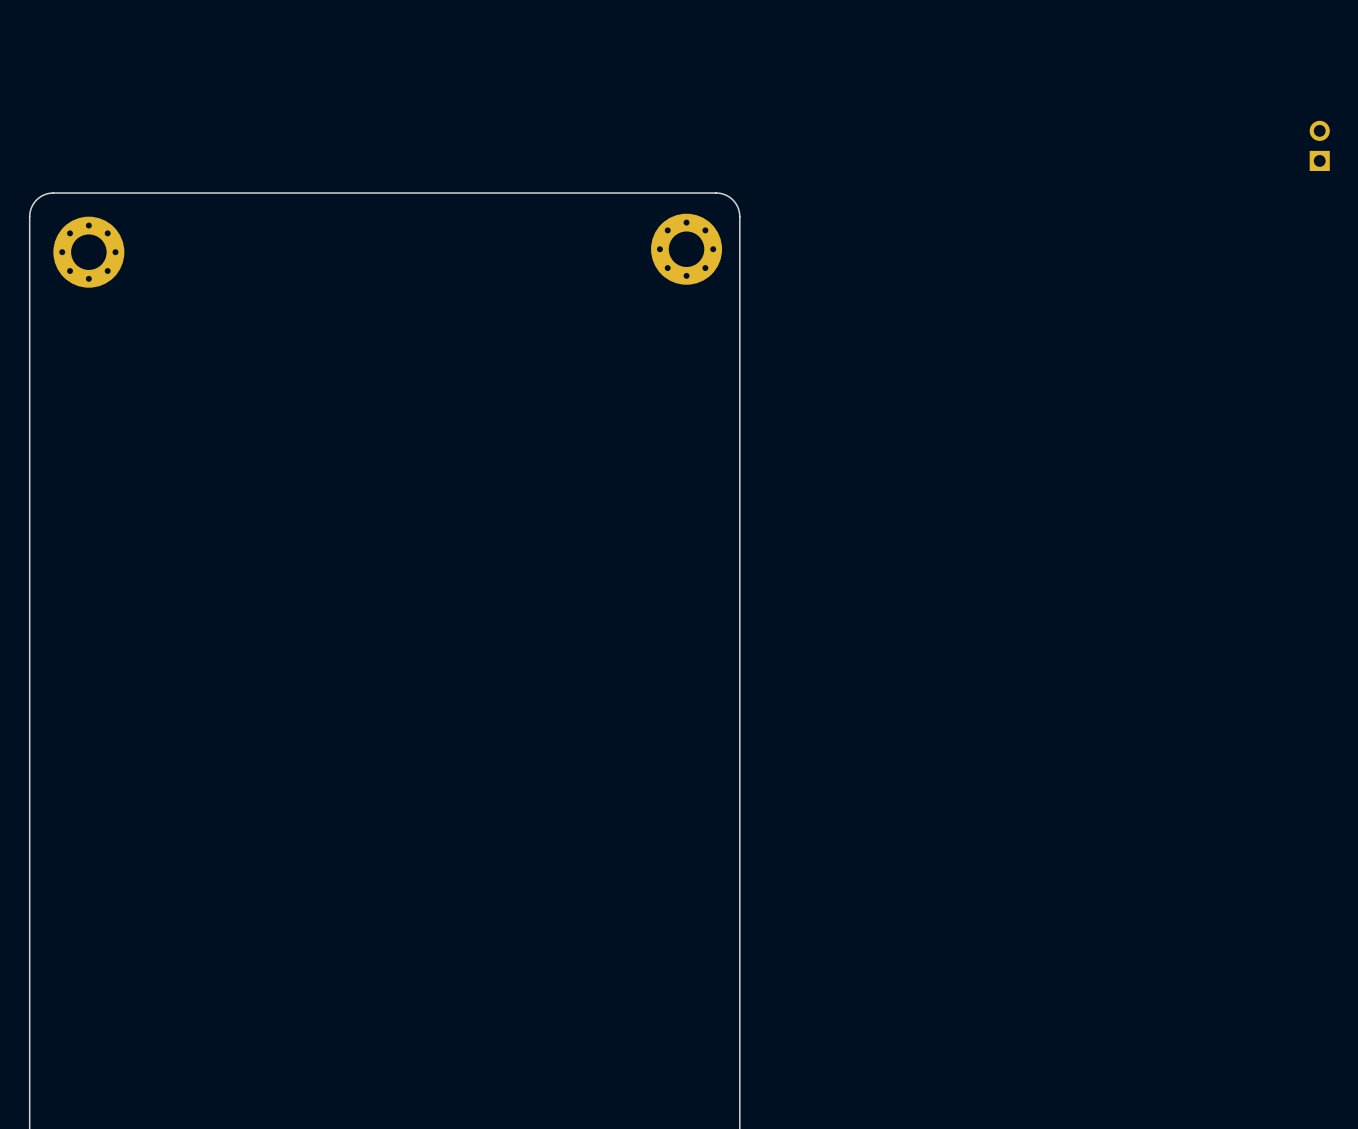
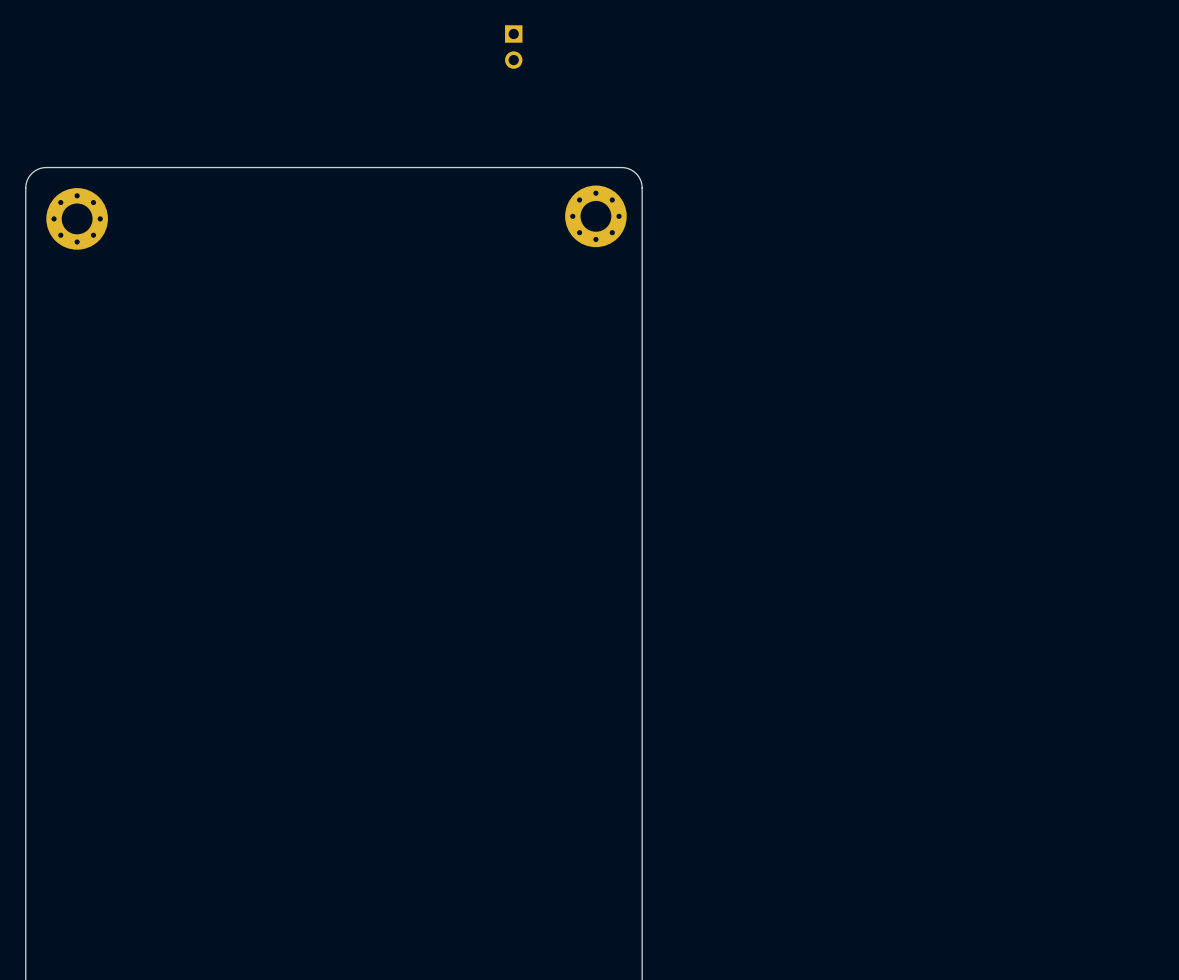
part: none -> (513, 47)
part: (1319, 145) -> none

